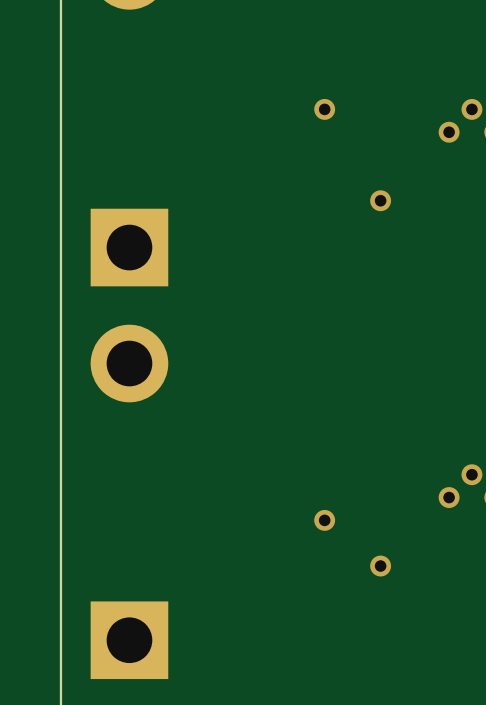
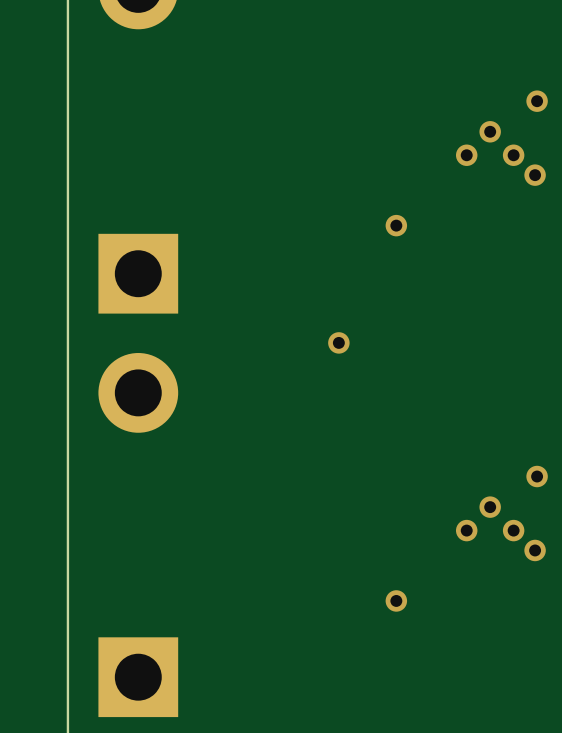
via: (324, 109) -> none
via: none -> (338, 342)
via: (324, 520) -> none

